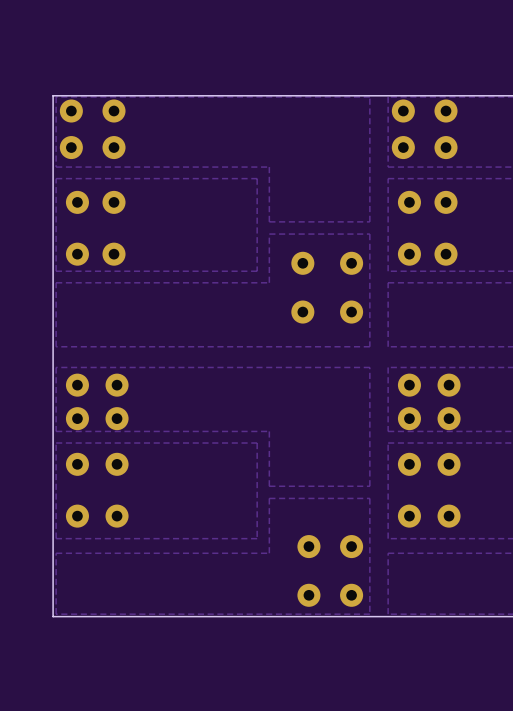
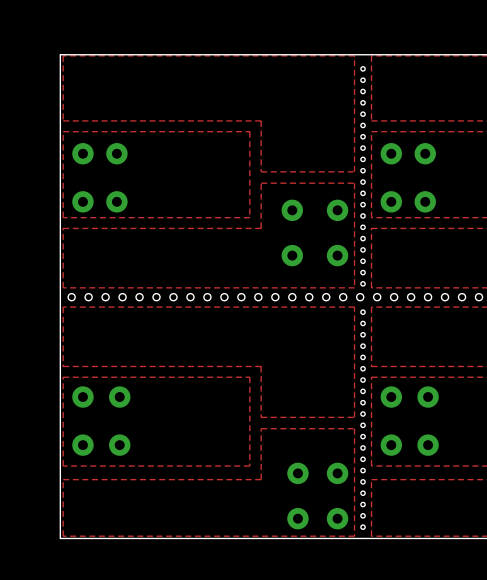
via: (71, 111) -> none
via: (114, 111) -> none
hole: none -> (363, 68)
via: (403, 111) -> none
via: (446, 111) -> none
hole: none -> (363, 80)
hole: none -> (363, 91)
via: (71, 147) -> none
via: (114, 147) -> none
hole: none -> (363, 102)
via: (403, 147) -> none
via: (446, 147) -> none
hole: none -> (363, 114)
hole: none -> (363, 125)
hole: none -> (363, 136)
hole: none -> (363, 148)
hole: none -> (363, 159)
hole: none -> (363, 170)
hole: none -> (363, 182)
hole: none -> (363, 193)
hole: none -> (363, 204)
hole: none -> (363, 215)
hole: none -> (363, 227)
hole: none -> (363, 238)
hole: none -> (363, 249)
hole: none -> (363, 261)
hole: none -> (363, 272)
hole: none -> (363, 283)
hole: none -> (71, 297)
hole: none -> (88, 297)
hole: none -> (105, 297)
hole: none -> (122, 297)
hole: none -> (139, 297)
hole: none -> (156, 297)
hole: none -> (173, 297)
hole: none -> (190, 297)
hole: none -> (207, 297)
hole: none -> (224, 297)
hole: none -> (241, 297)
hole: none -> (258, 297)
hole: none -> (275, 297)
hole: none -> (292, 297)
hole: none -> (309, 297)
hole: none -> (326, 297)
hole: none -> (343, 297)
hole: none -> (360, 297)
hole: none -> (377, 297)
hole: none -> (394, 297)
hole: none -> (411, 297)
hole: none -> (428, 297)
hole: none -> (445, 297)
hole: none -> (462, 297)
hole: none -> (479, 297)
hole: none -> (363, 312)
via: (77, 385) -> none
via: (117, 385) -> none
hole: none -> (363, 323)
via: (409, 385) -> none
via: (449, 385) -> none
hole: none -> (363, 334)
hole: none -> (363, 346)
via: (77, 418) -> none
via: (117, 418) -> none
via: (409, 418) -> none
via: (449, 418) -> none
hole: none -> (363, 357)
hole: none -> (363, 368)
hole: none -> (363, 380)
hole: none -> (363, 391)
hole: none -> (363, 402)
hole: none -> (363, 414)
hole: none -> (363, 425)
hole: none -> (363, 436)
hole: none -> (363, 447)
hole: none -> (363, 459)
hole: none -> (363, 470)
hole: none -> (363, 481)
hole: none -> (363, 493)
hole: none -> (363, 504)
hole: none -> (363, 515)
hole: none -> (363, 527)

